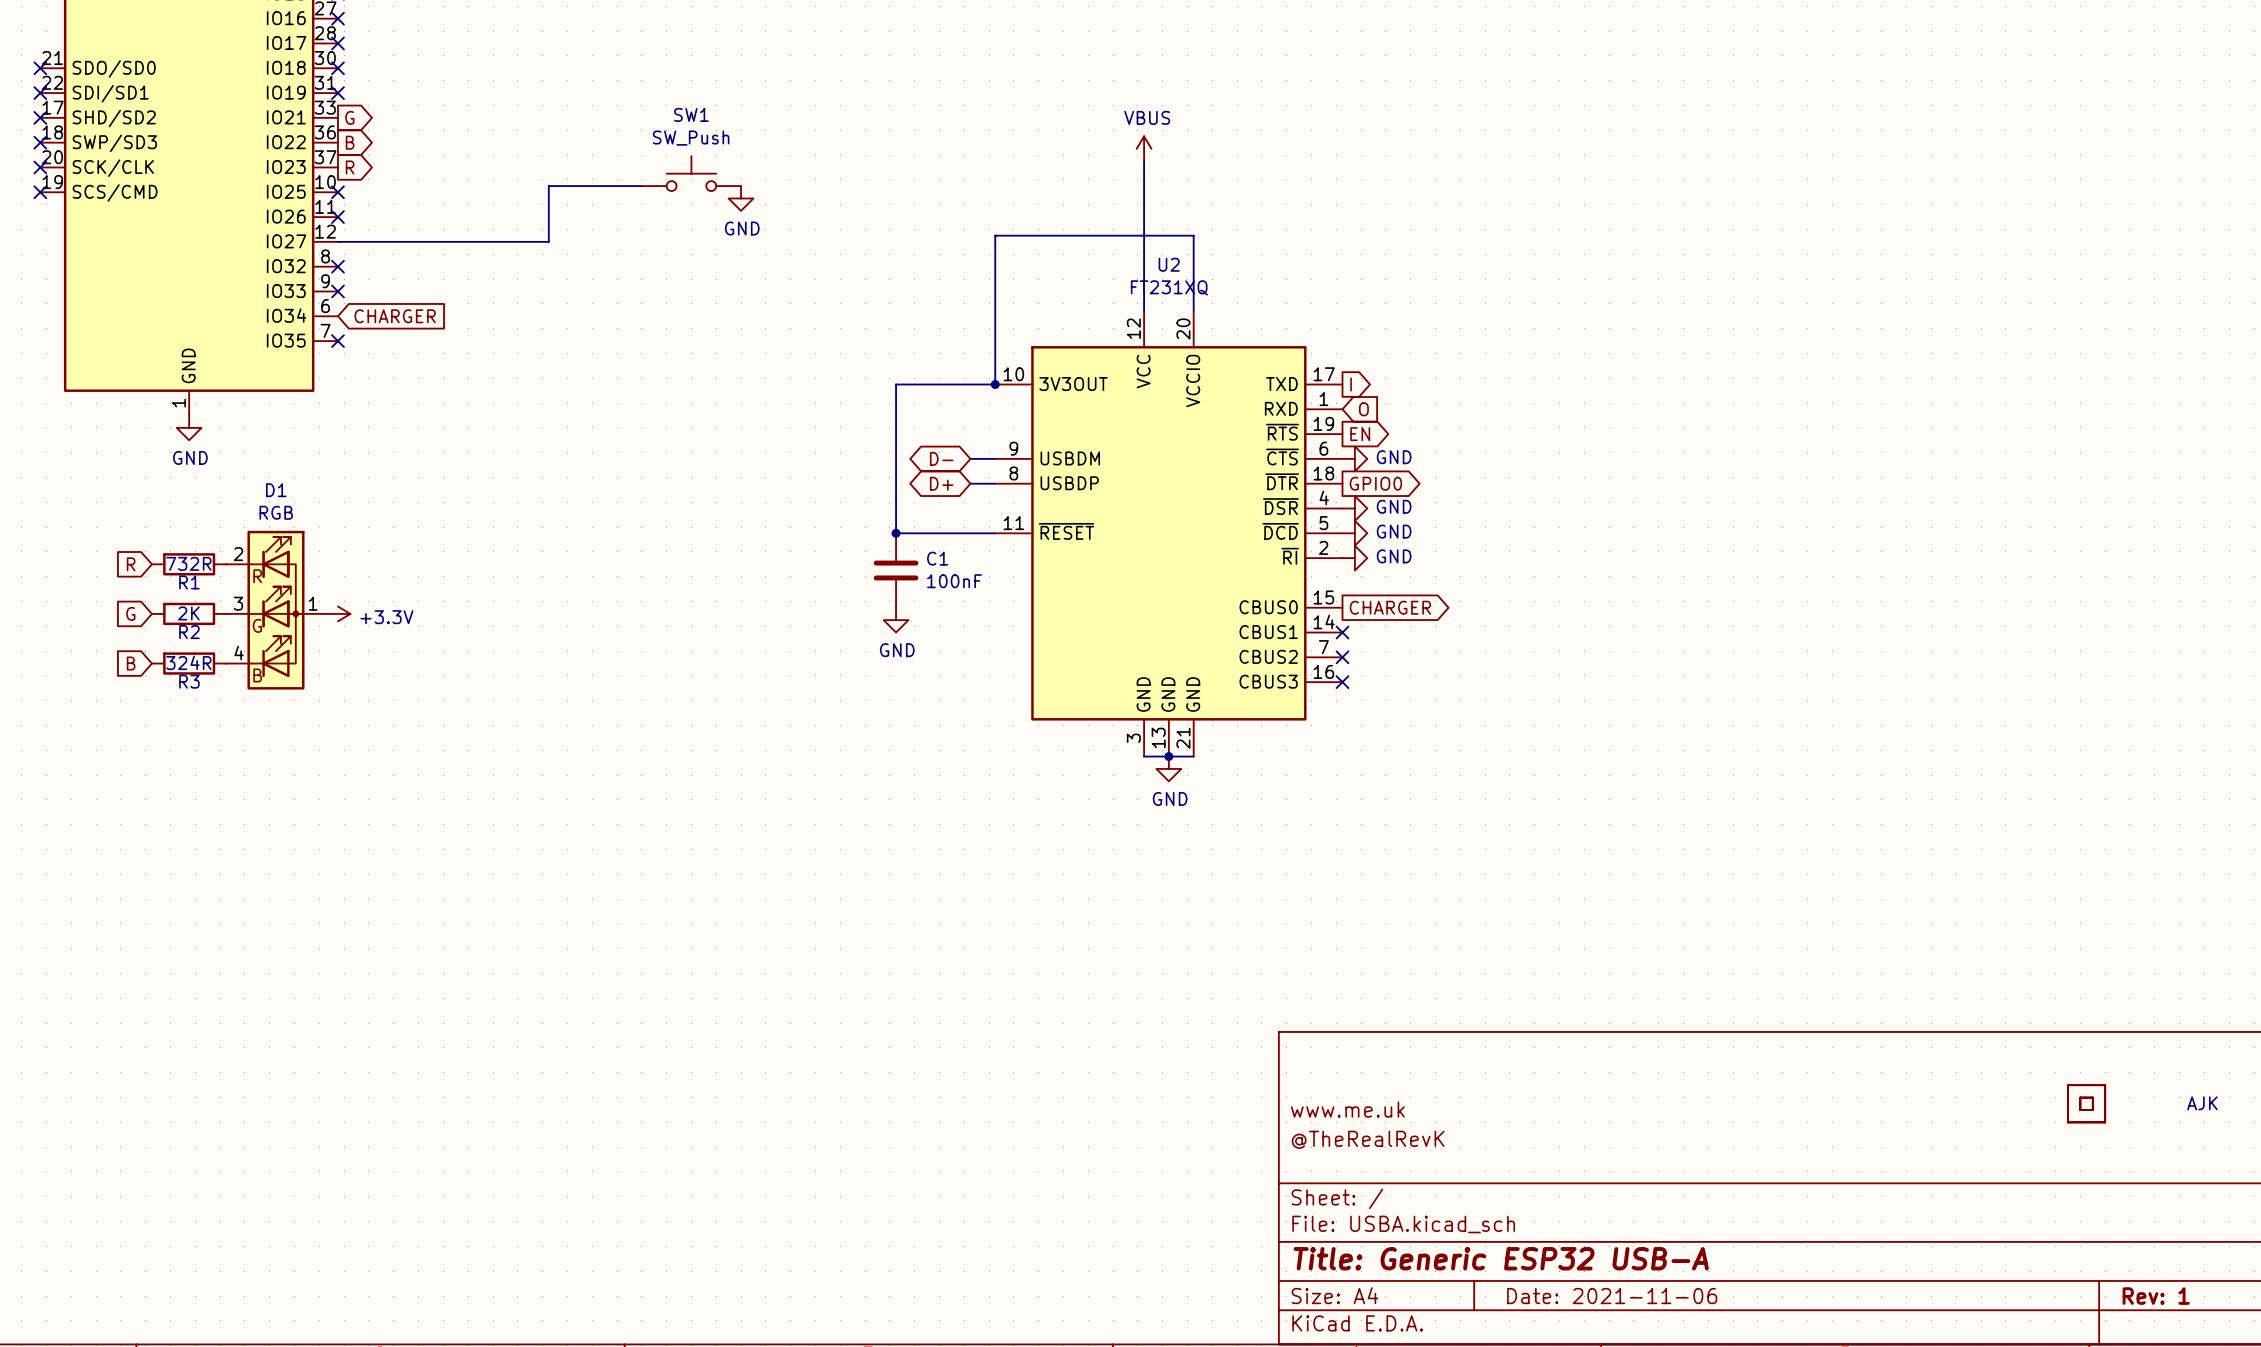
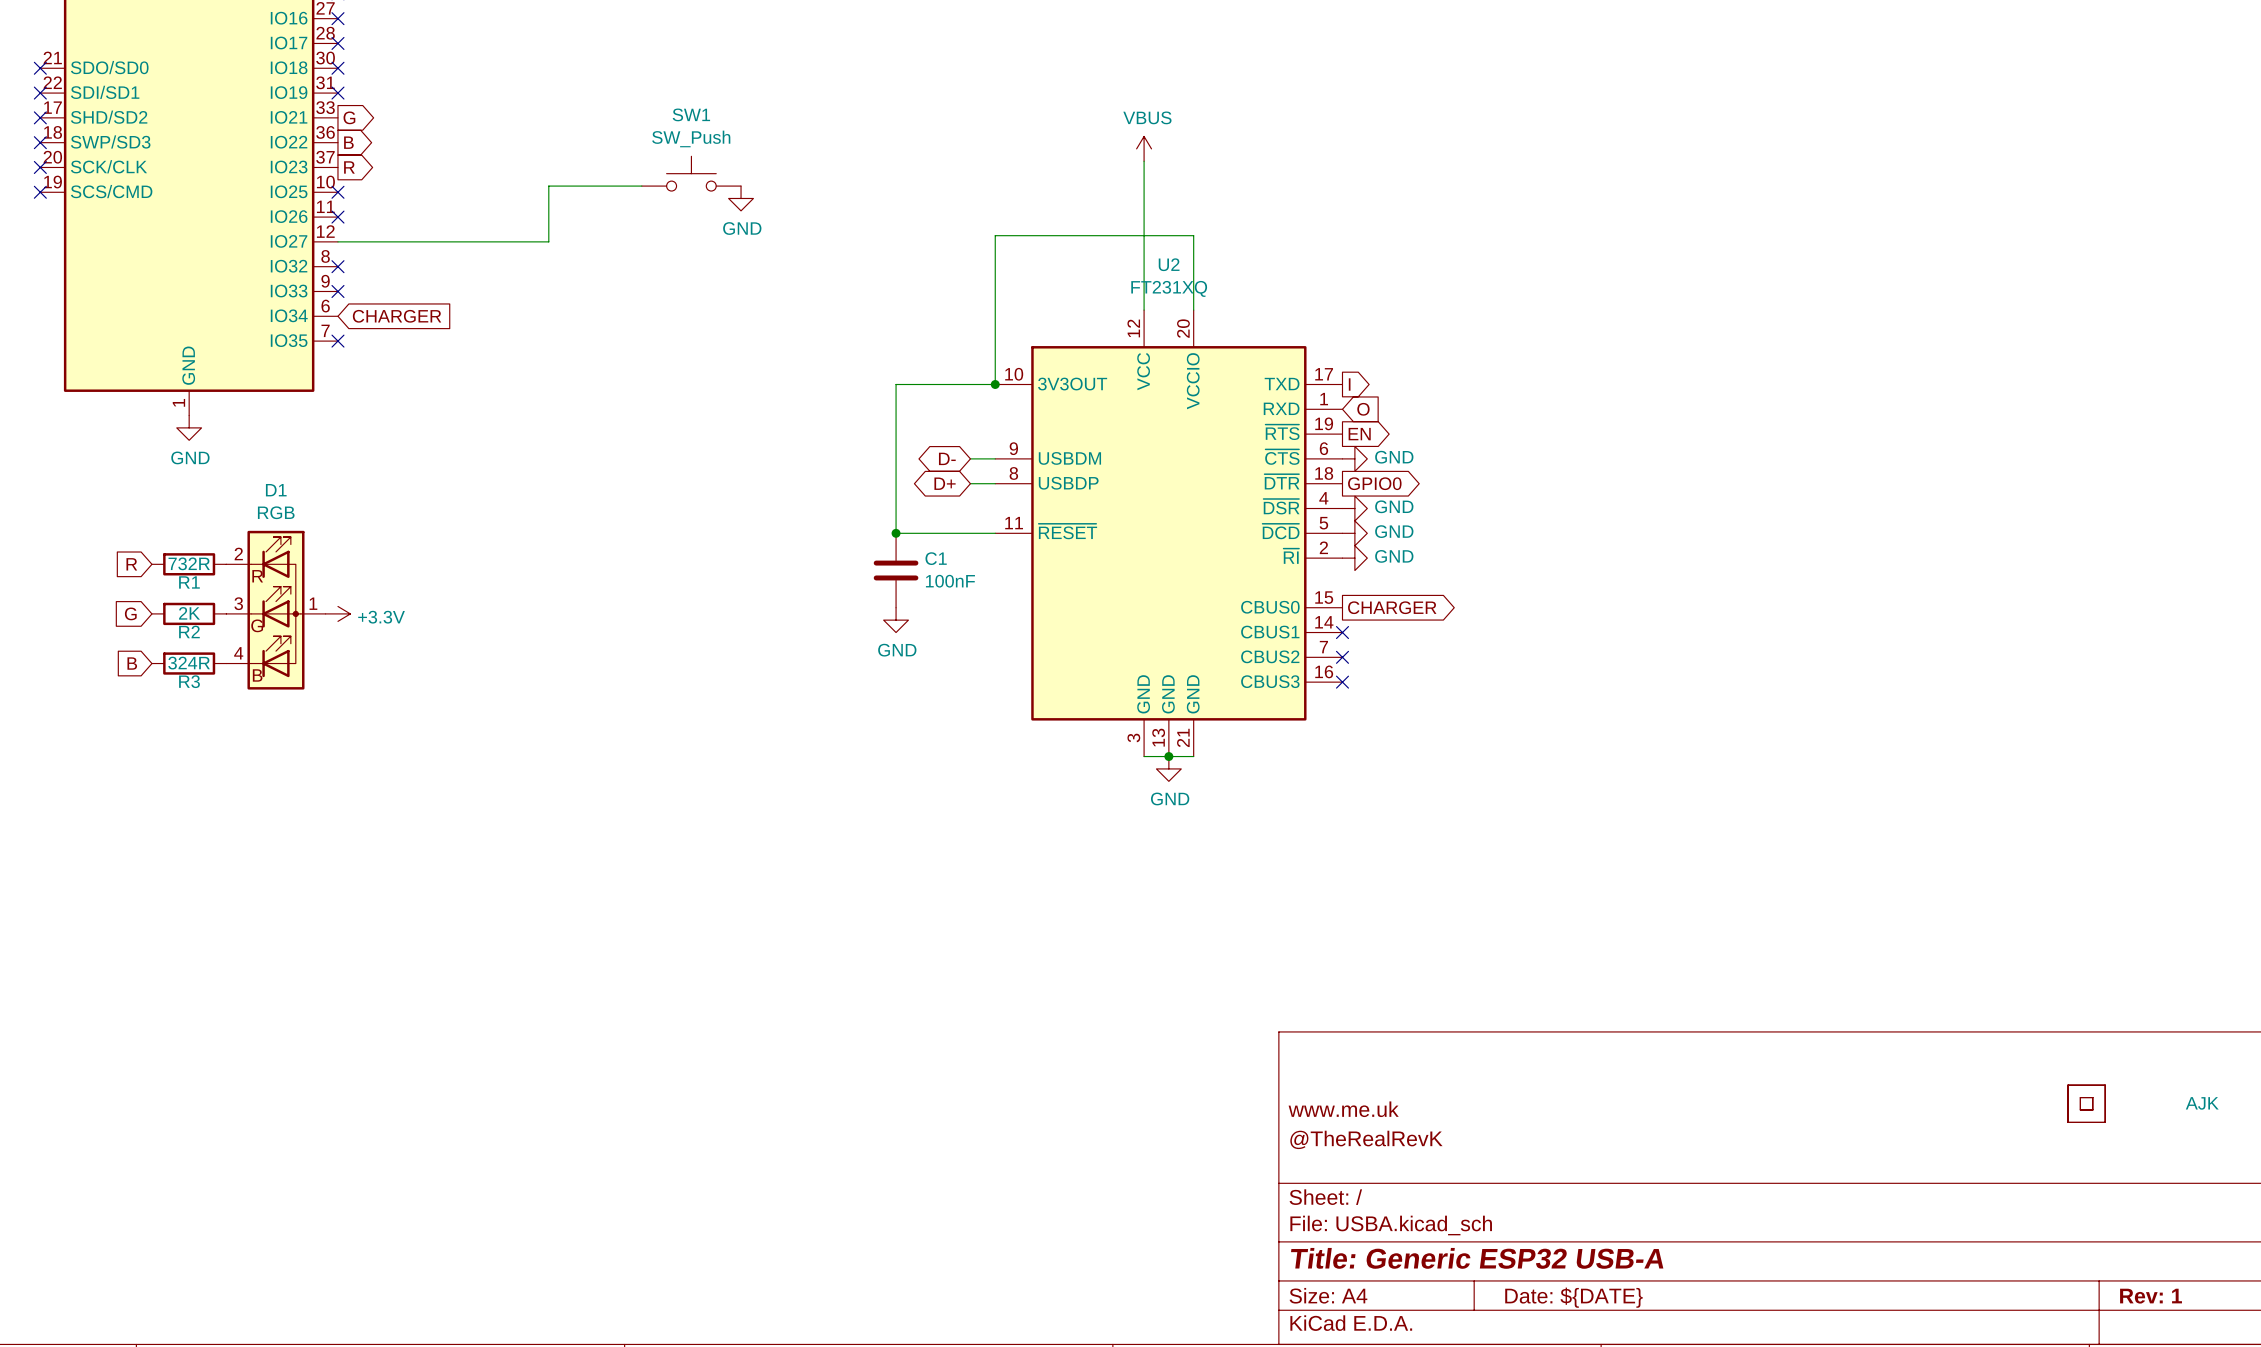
title block: Date: 2021-11-06 (1612, 1296) -> Date: ${DATE} (1573, 1297)

